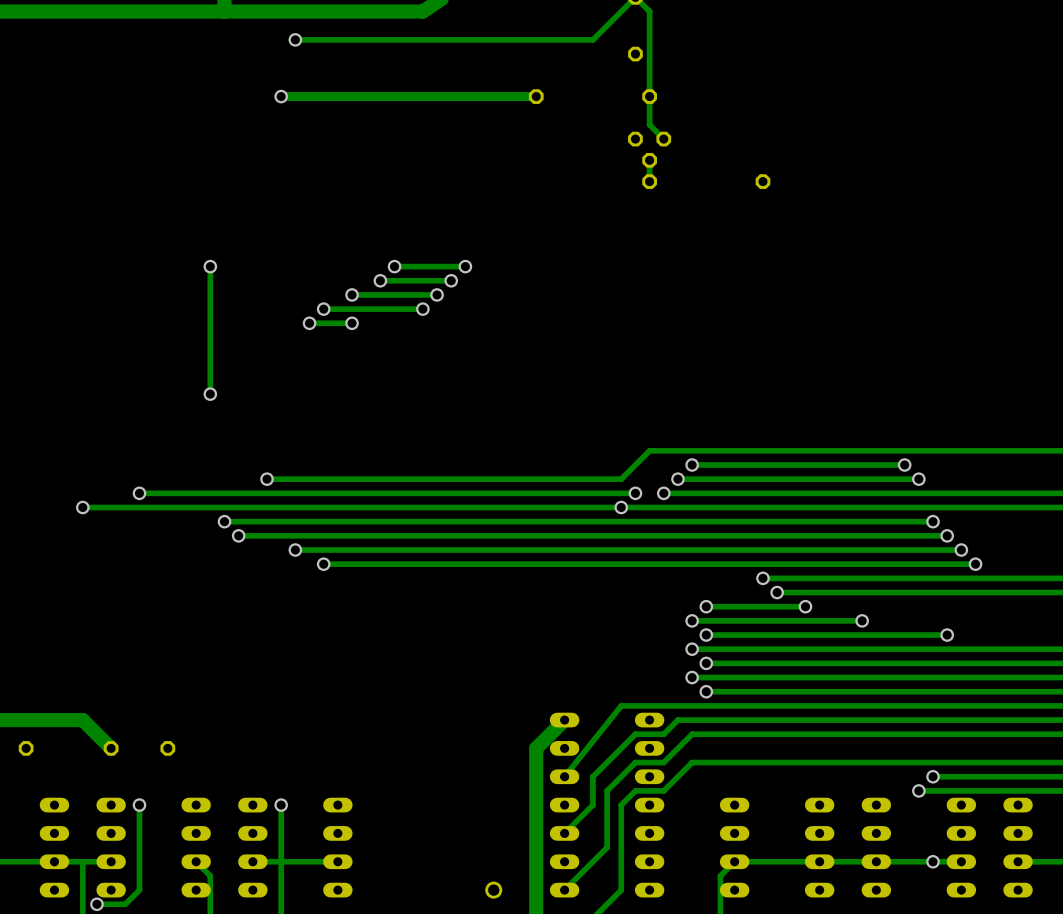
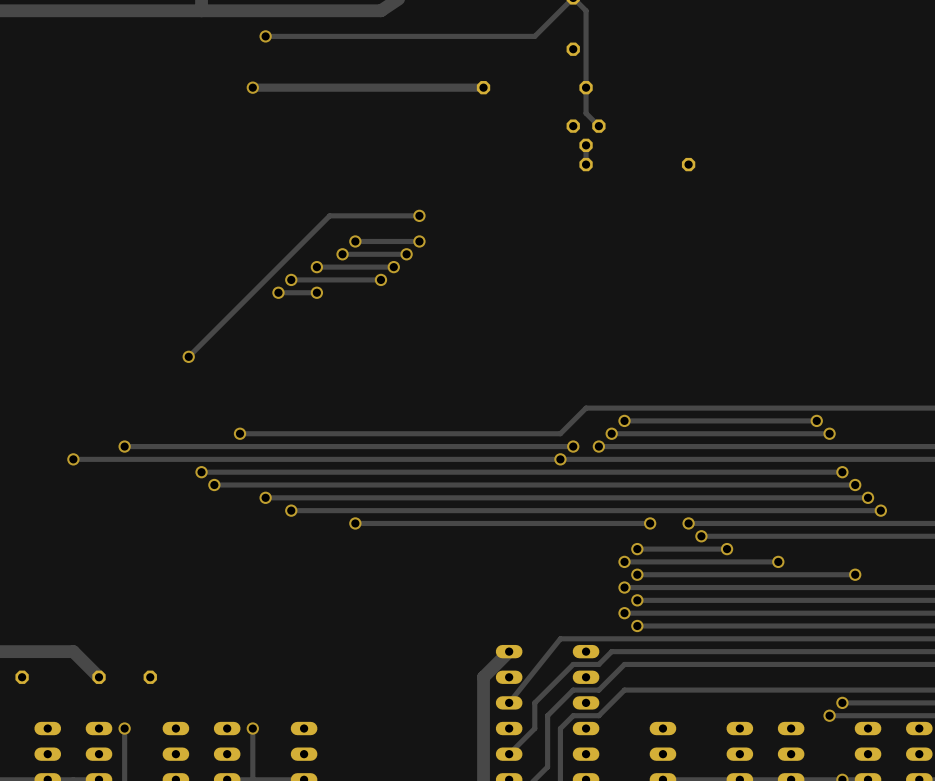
via: none -> (419, 215)
track: (210, 266) (210, 394) -> (419, 215) (329, 215) (188, 356)
via: (210, 266) -> none
via: none -> (355, 523)
track: none -> (650, 523) (355, 523)
via: none -> (650, 523)

